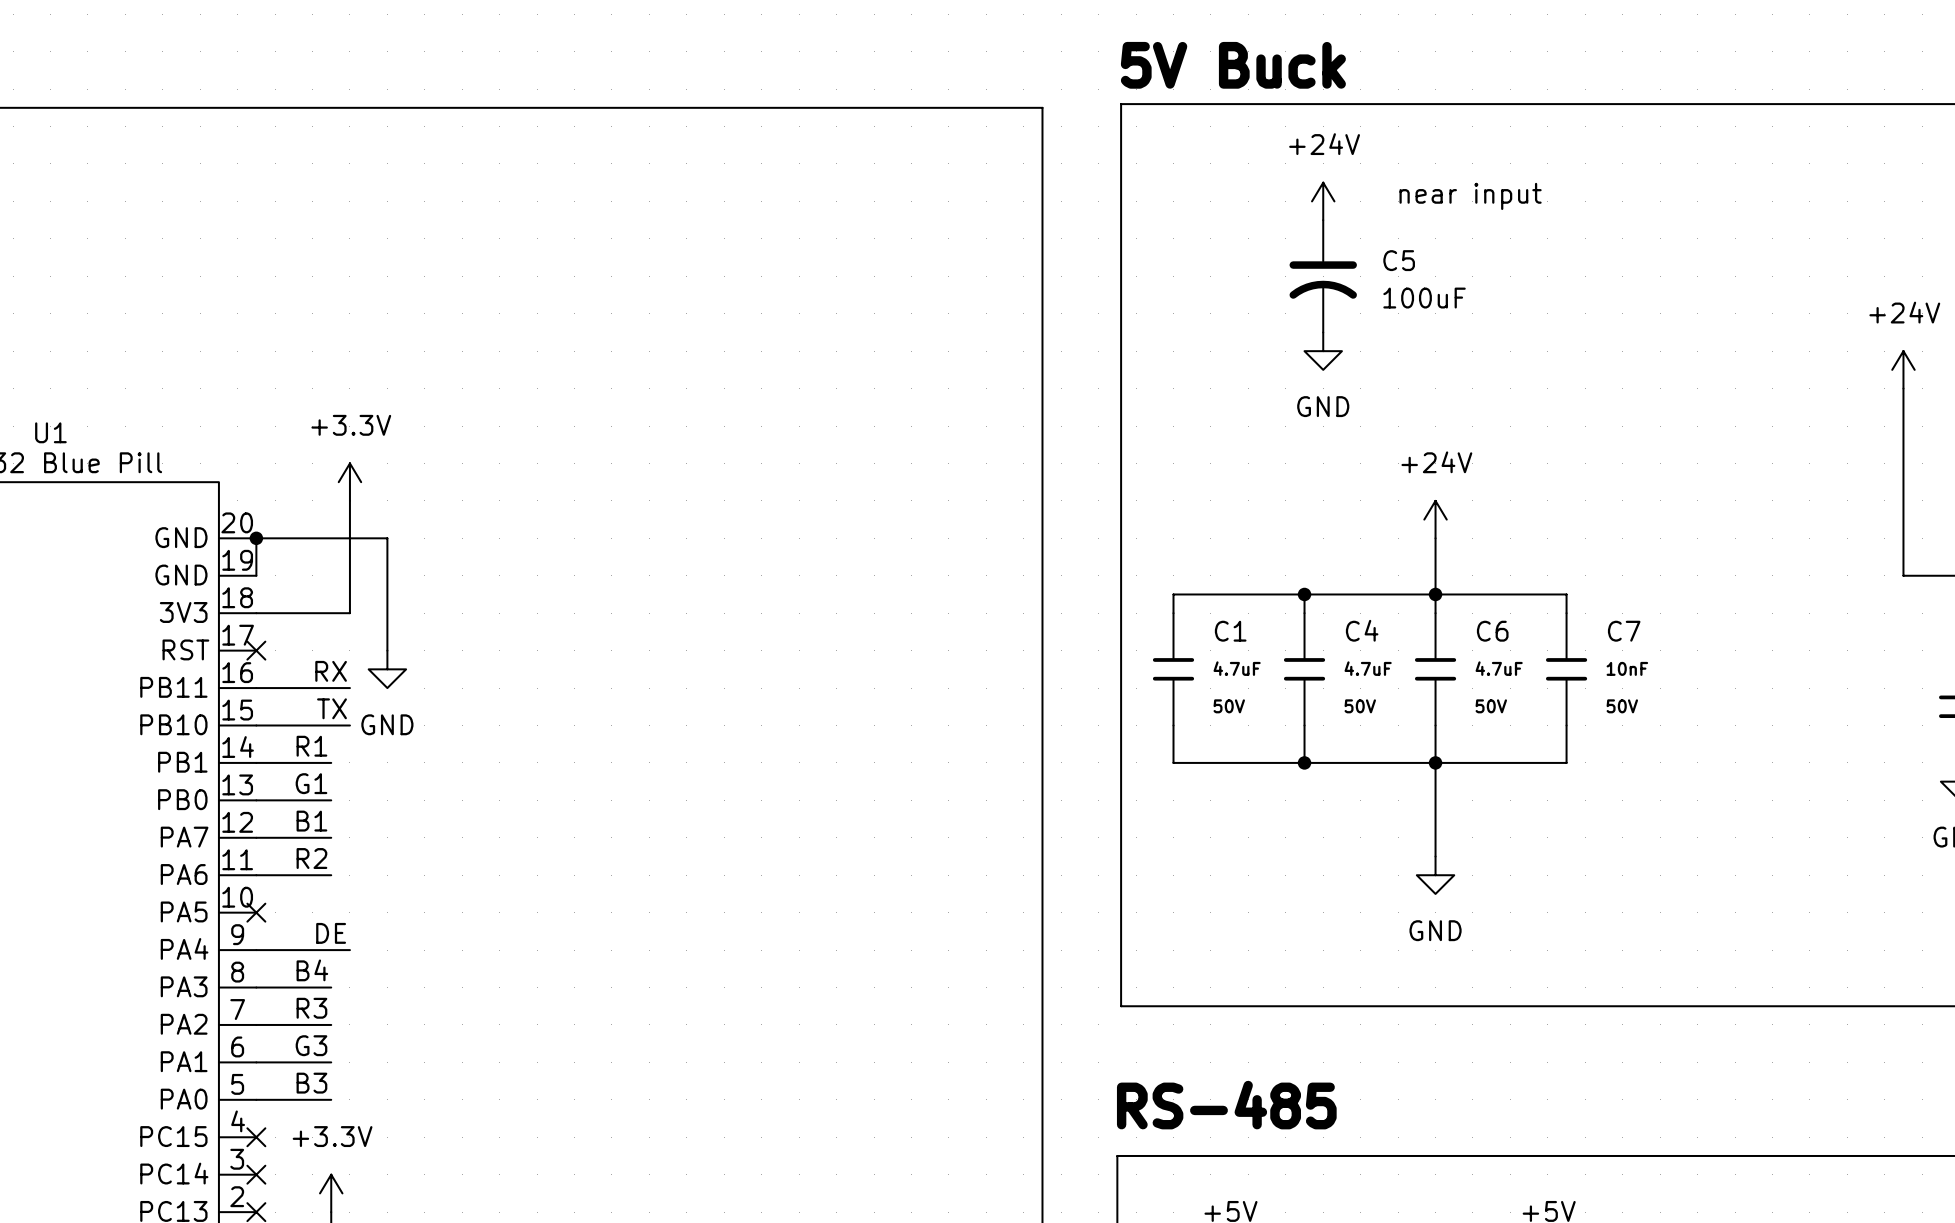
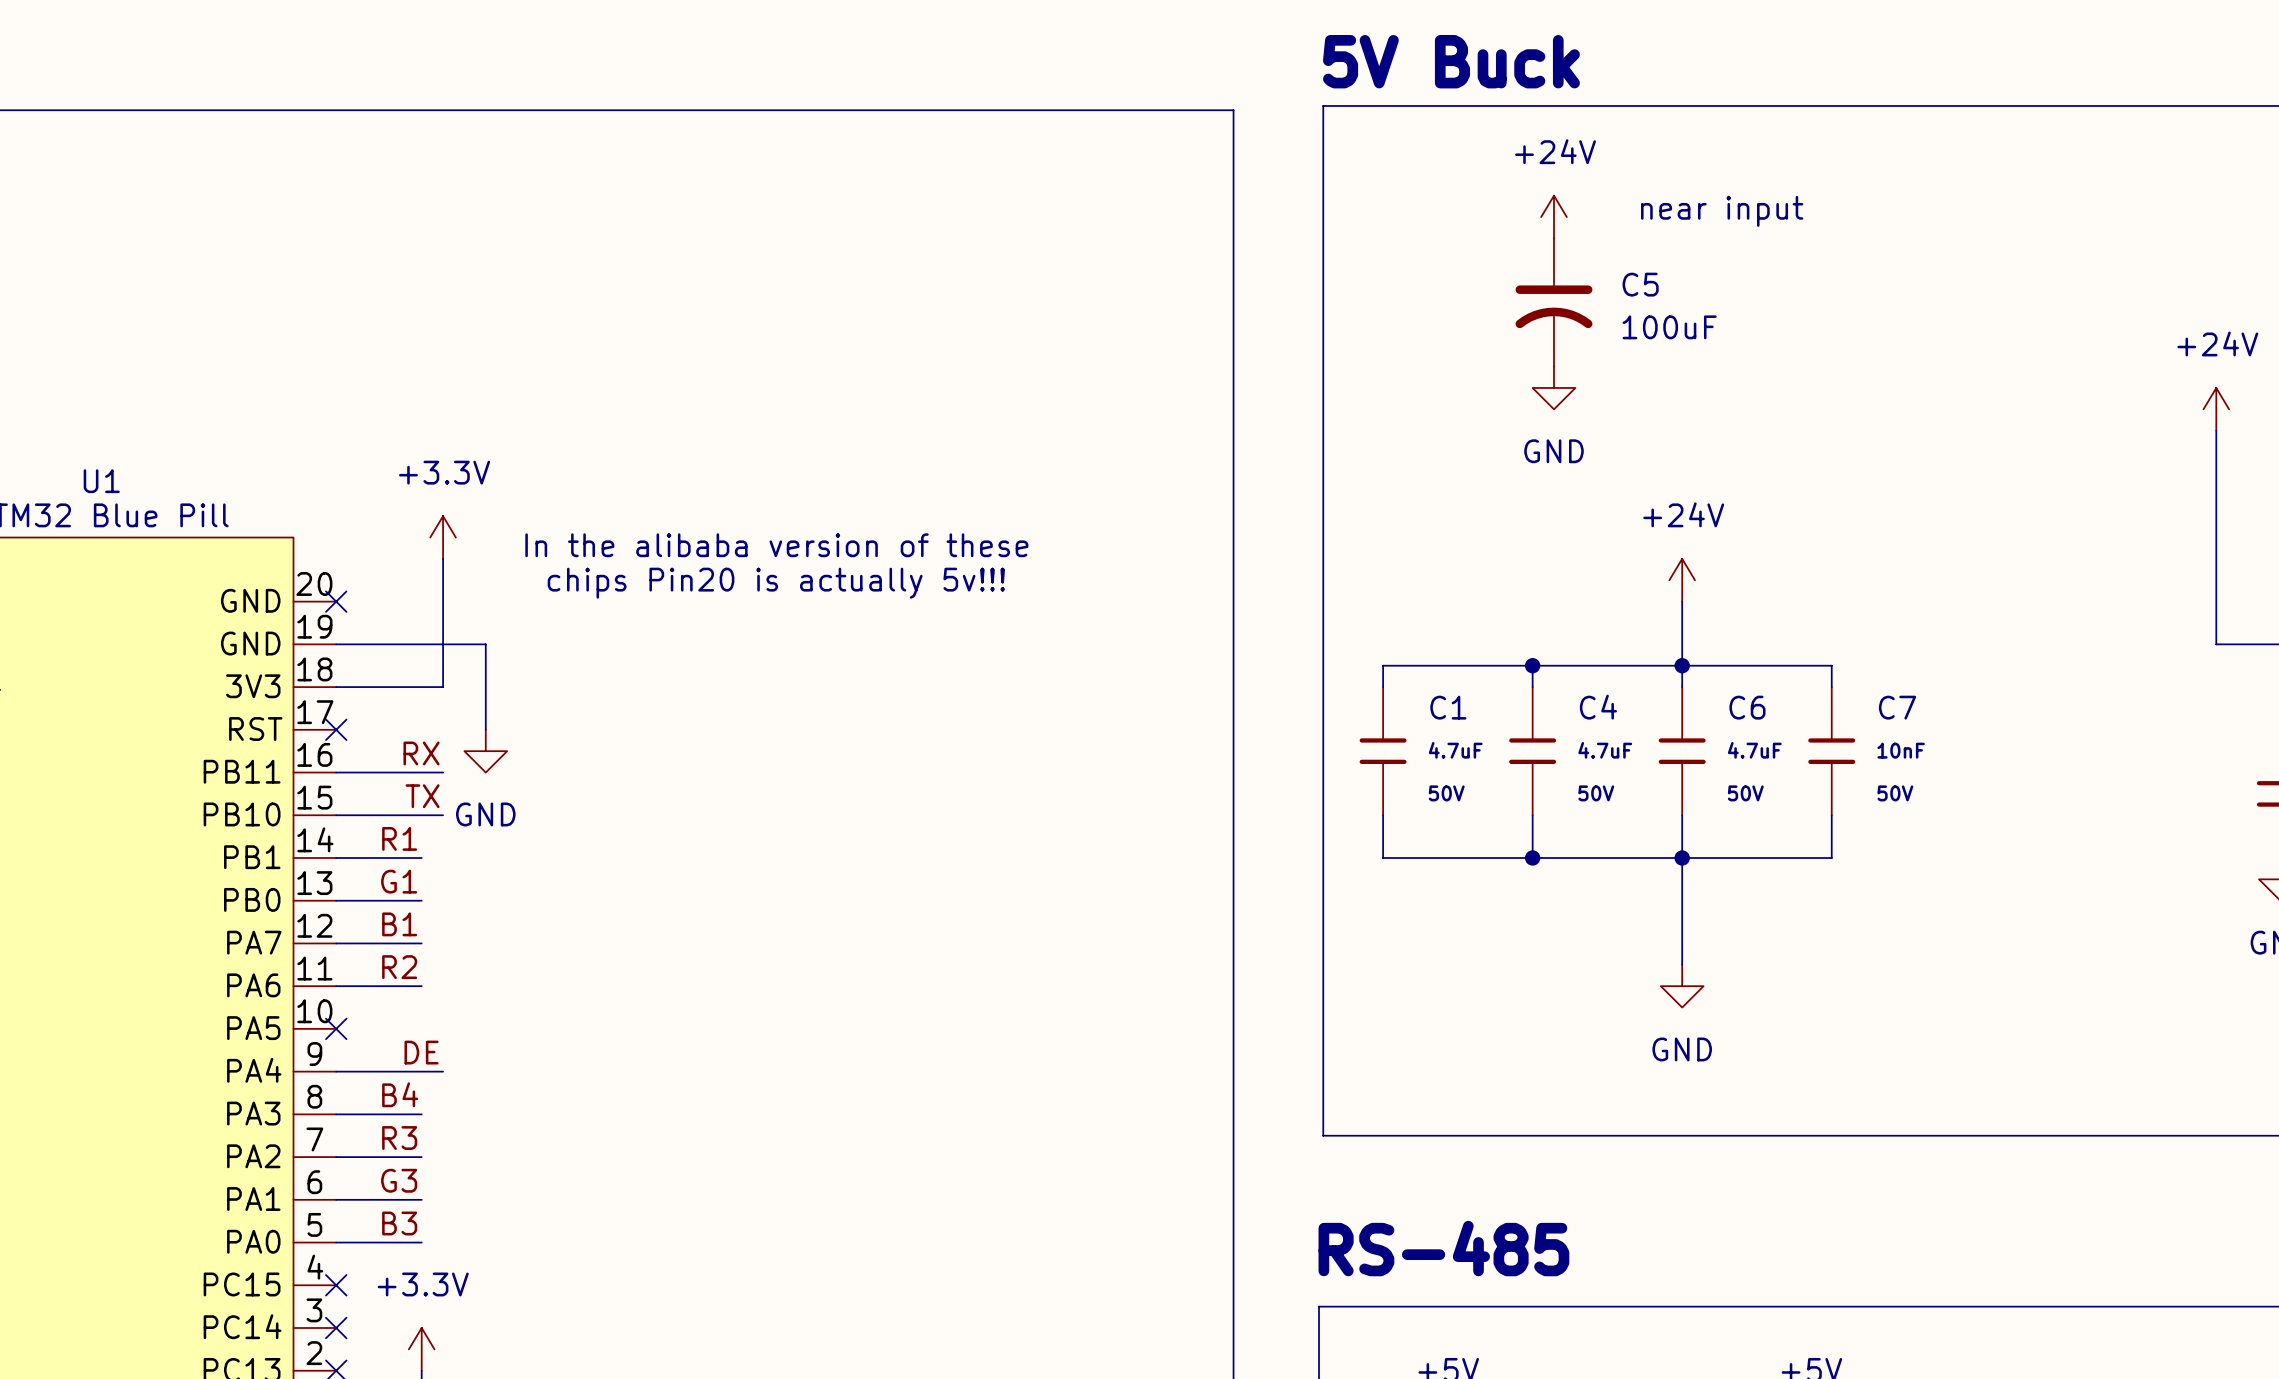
text: none -> In the alibaba version of these (776, 545)
text: none -> chips Pin20 is actually 5v!!! (776, 583)
junction: (256, 538) -> none
no-connect mark: none -> (336, 601)
wire: (256, 575) (256, 538) (387, 538) (387, 575) -> (336, 644) (485, 644)

